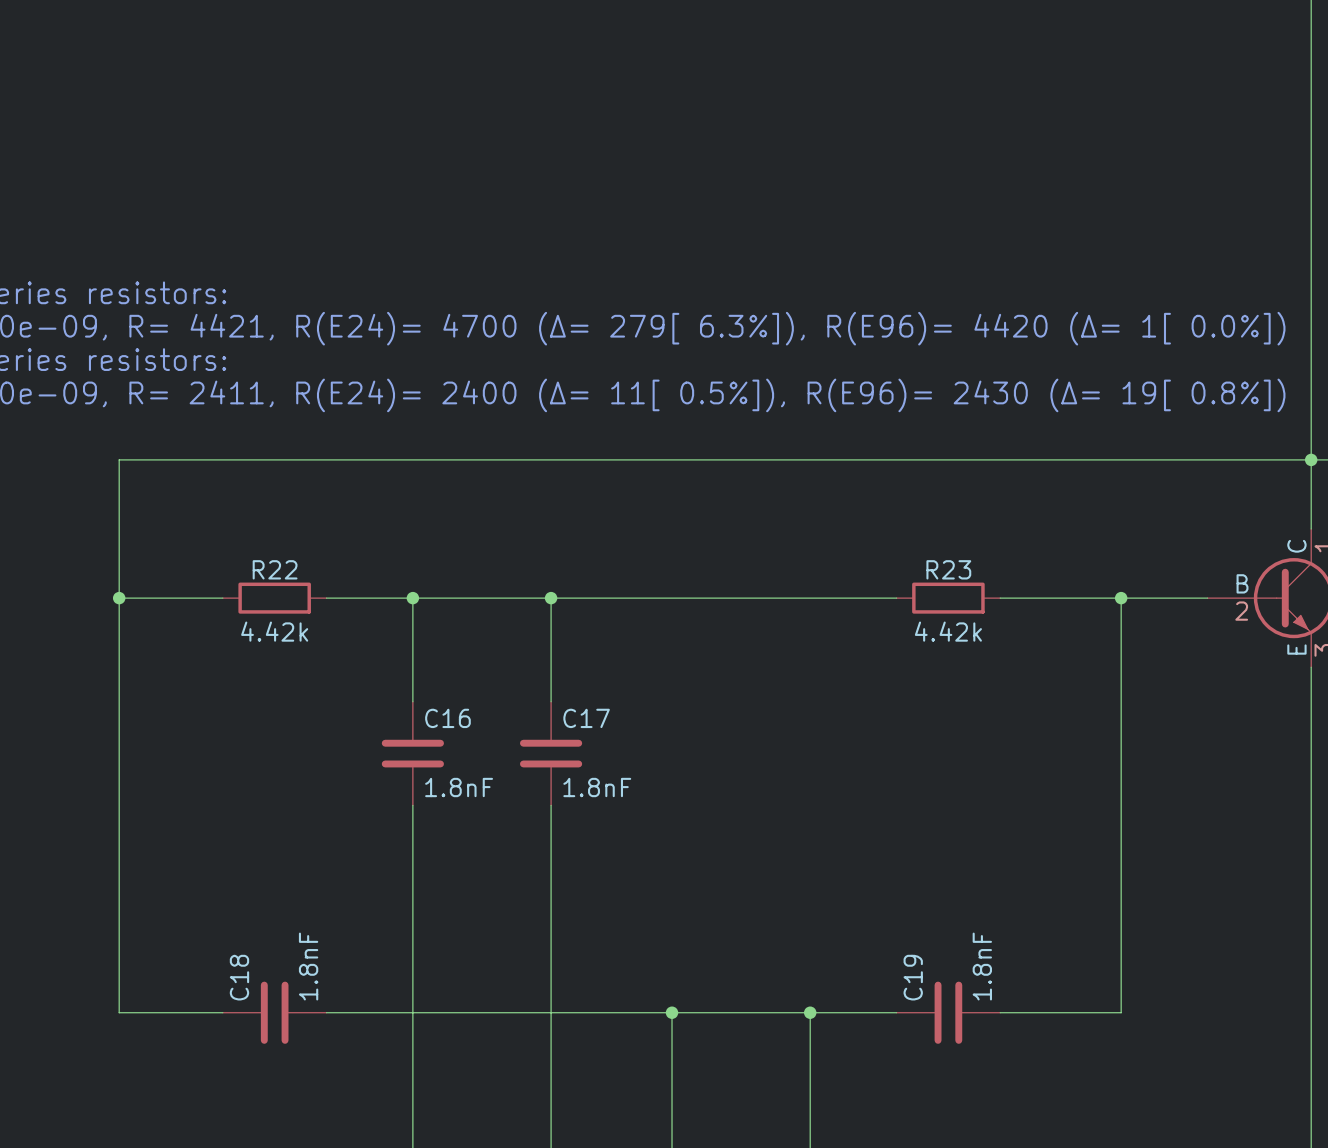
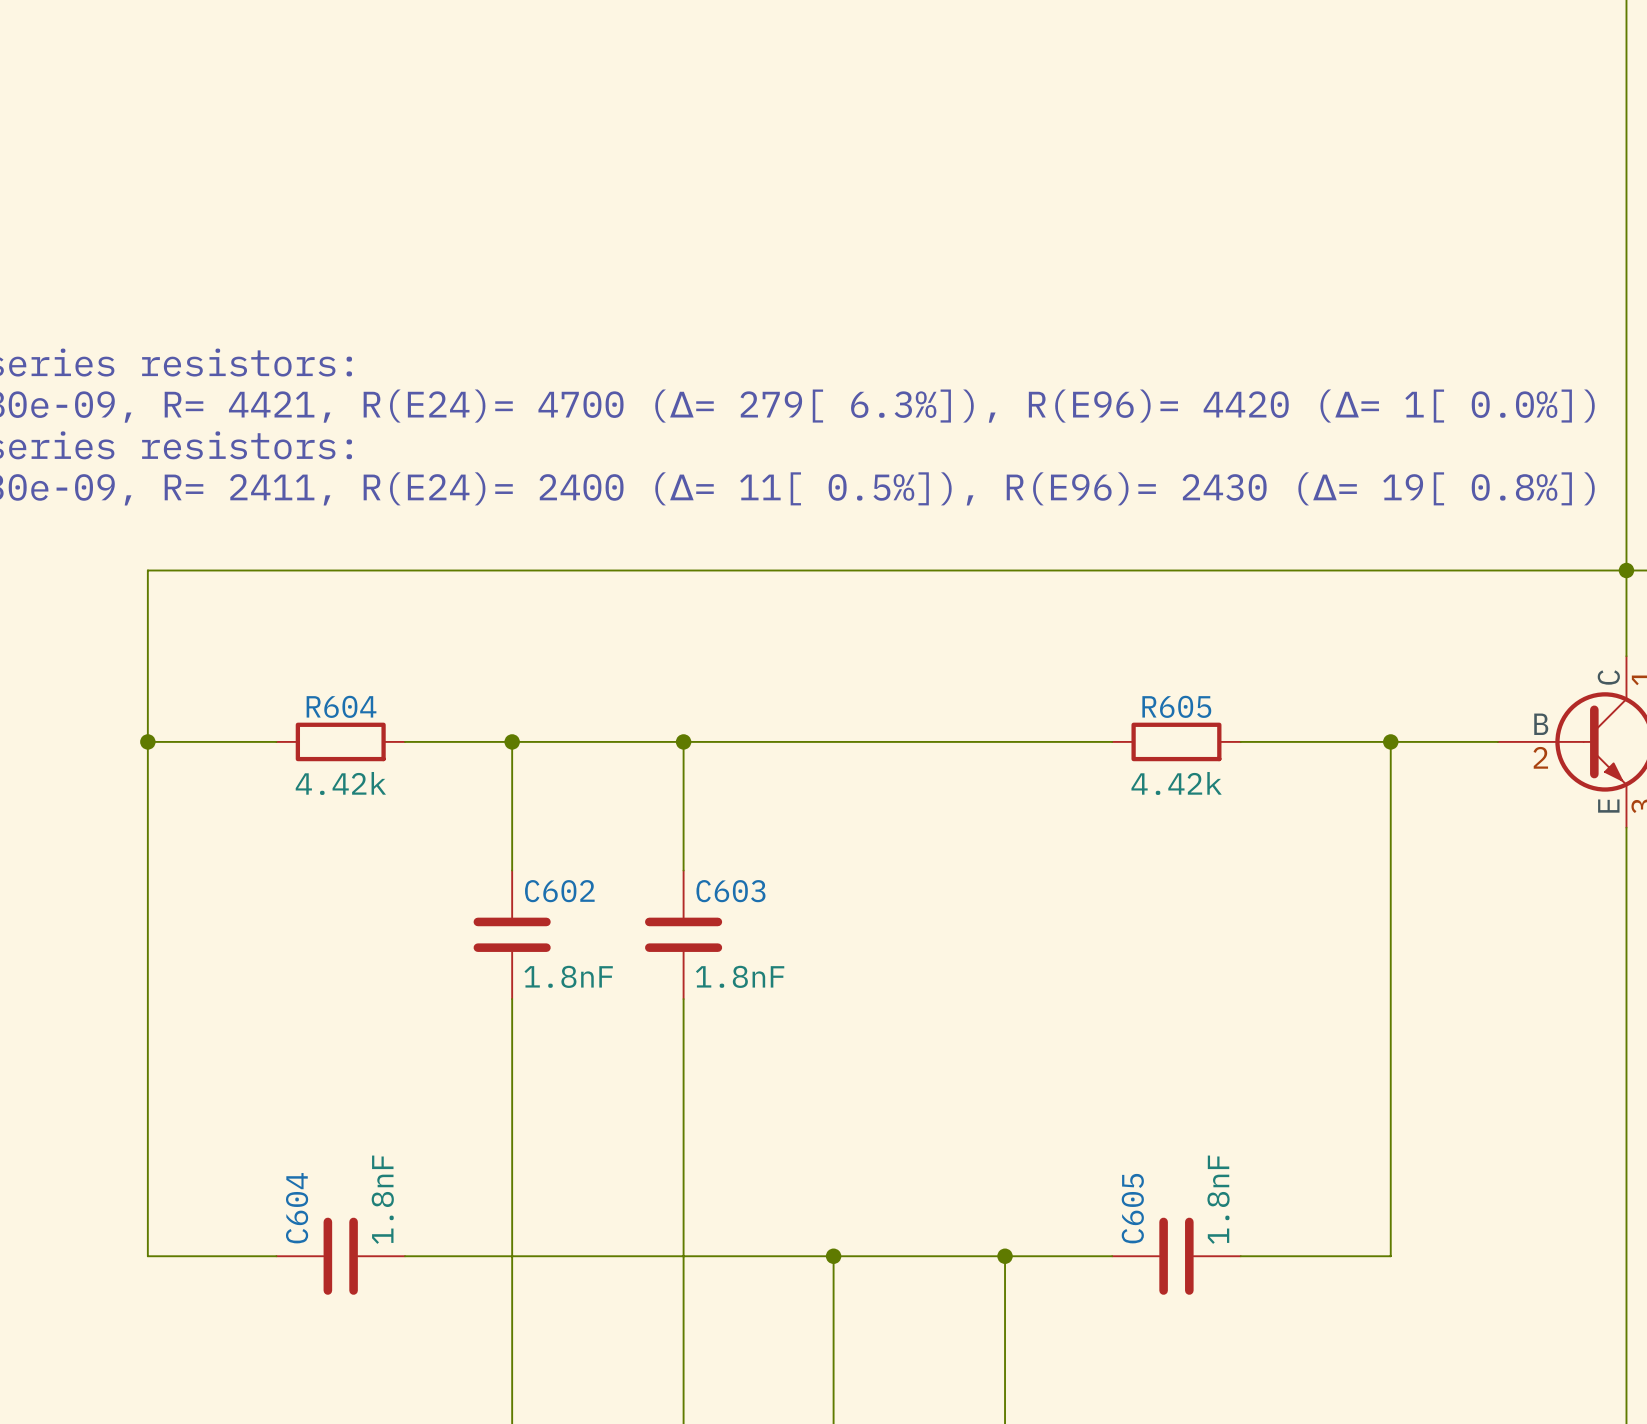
R22 name: R22 (275, 569) -> R604 (341, 706)
R23 name: R23 (948, 569) -> R605 (1176, 706)
C16 name: C16 (447, 718) -> C602 (559, 891)
C17 name: C17 (586, 718) -> C603 (730, 891)
C18 name: C18 (239, 977) -> C604 (297, 1208)
C19 name: C19 (913, 977) -> C605 (1132, 1208)

